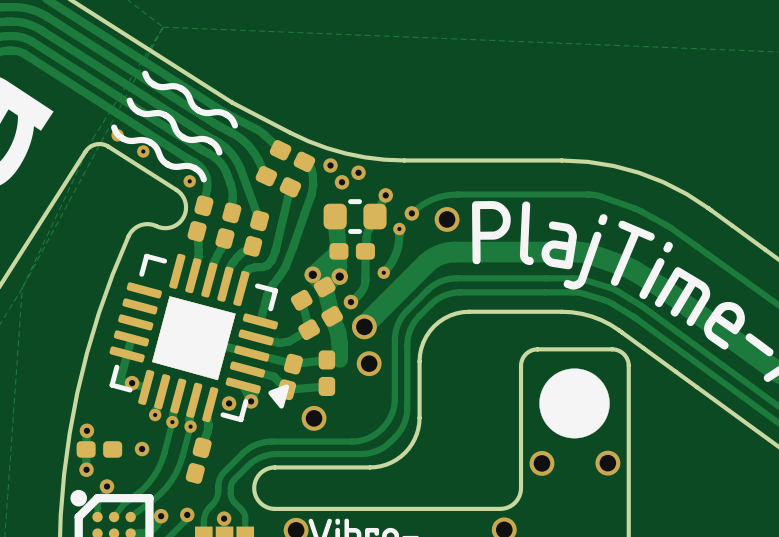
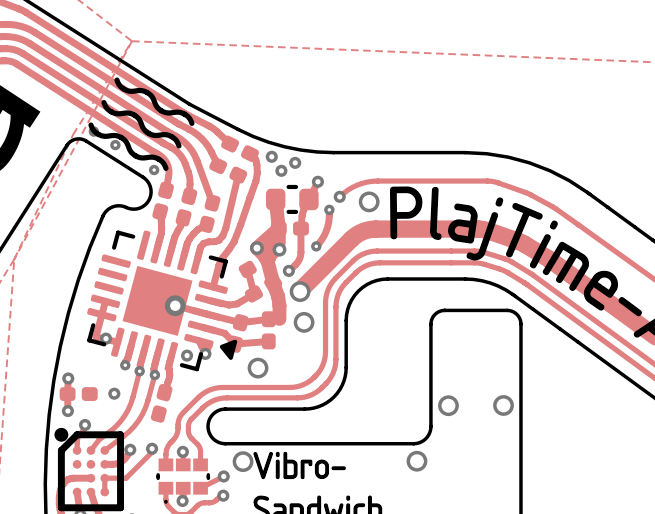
drawing: [152, 296, 236, 381] -> none
drawing: [539, 368, 610, 439] -> none

